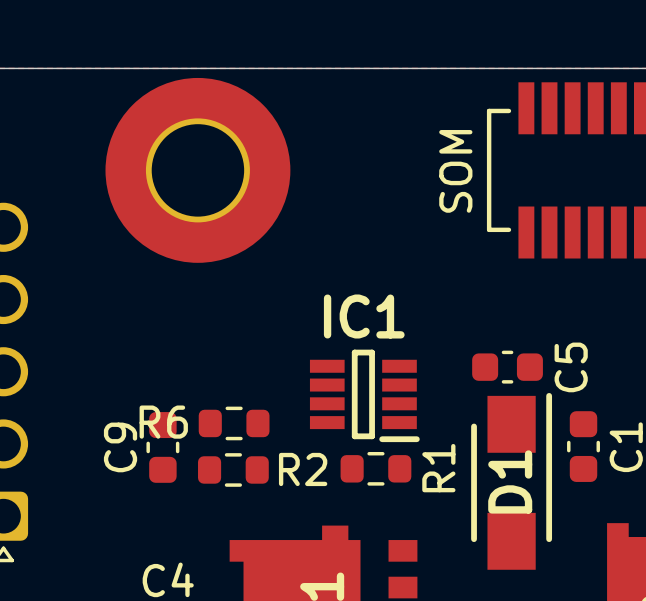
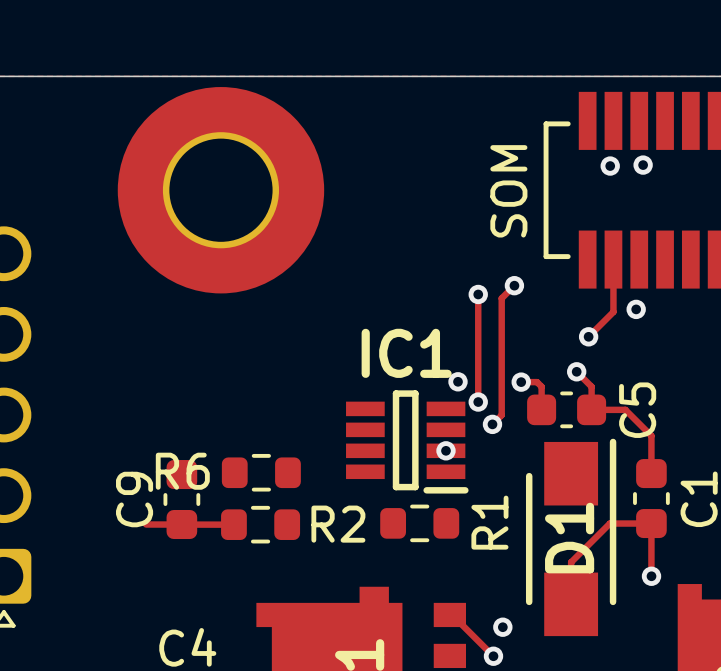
via: none -> (643, 165)
via: none -> (610, 166)
track: none -> (613, 259) (613, 311) (588, 336)
track: none -> (514, 285) (501, 298) (501, 415) (492, 424)
via: none -> (514, 285)
track: none -> (478, 294) (478, 402)
via: none -> (478, 294)
via: none -> (636, 309)
via: none -> (588, 336)
track: none -> (576, 371) (591, 386) (591, 409) (625, 409) (651, 435) (651, 473)
via: none -> (576, 371)
via: none -> (458, 381)
track: none -> (521, 382) (537, 382) (541, 386) (540, 408)
via: none -> (521, 382)
via: none -> (478, 402)
via: none -> (492, 424)
via: none -> (446, 450)
track: none -> (146, 524) (233, 524)
track: none -> (651, 576) (651, 523) (609, 523) (571, 562) (571, 604)
via: none -> (651, 576)
track: none -> (452, 614) (493, 656)
via: none -> (502, 627)
via: none -> (493, 656)

